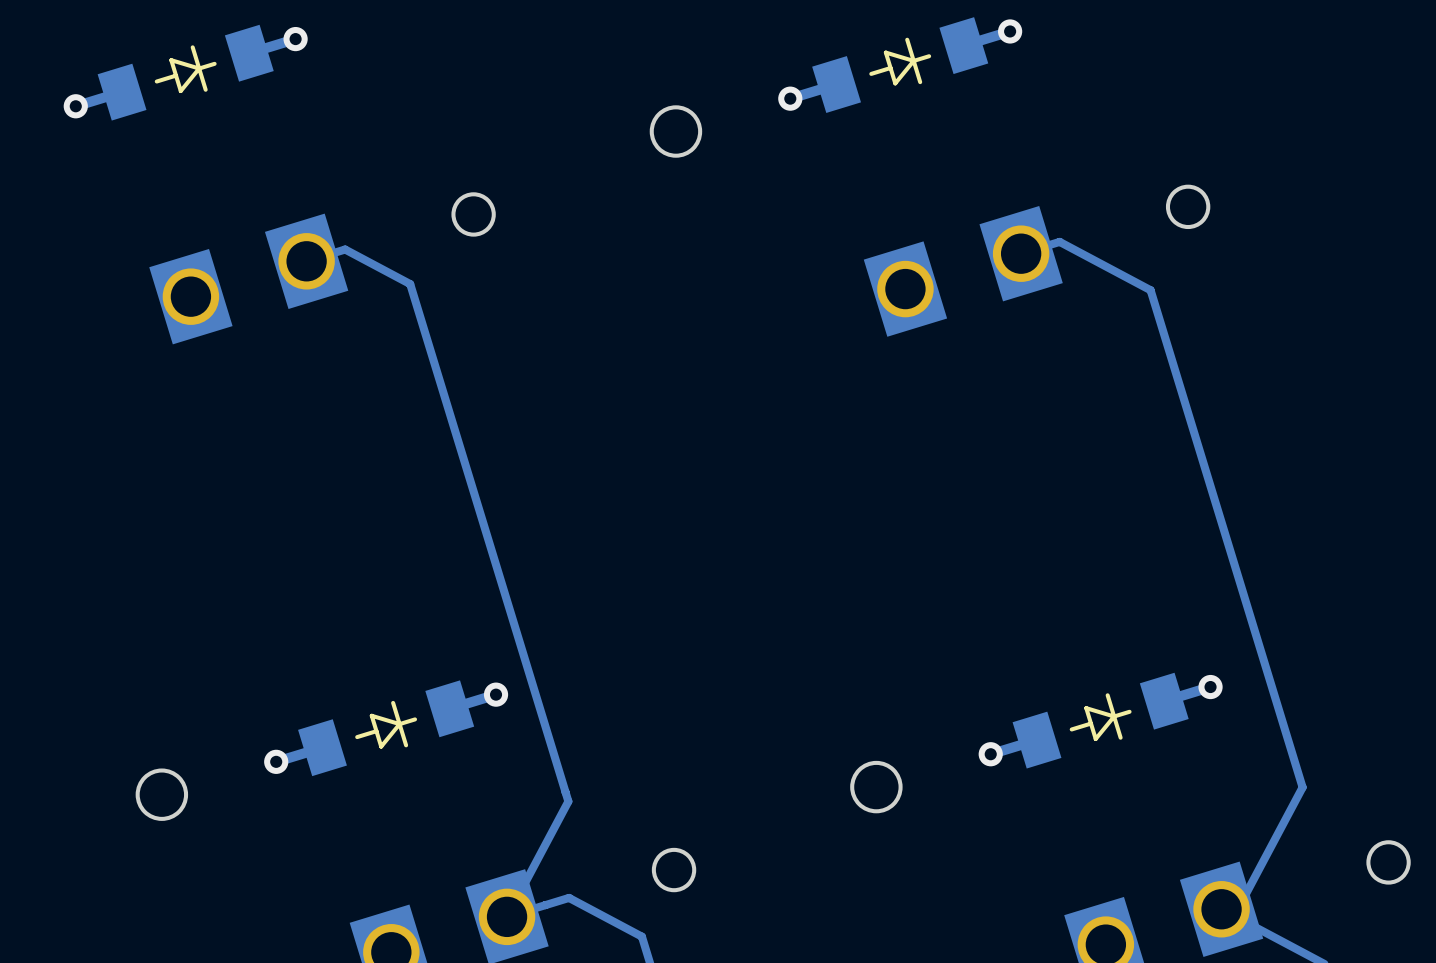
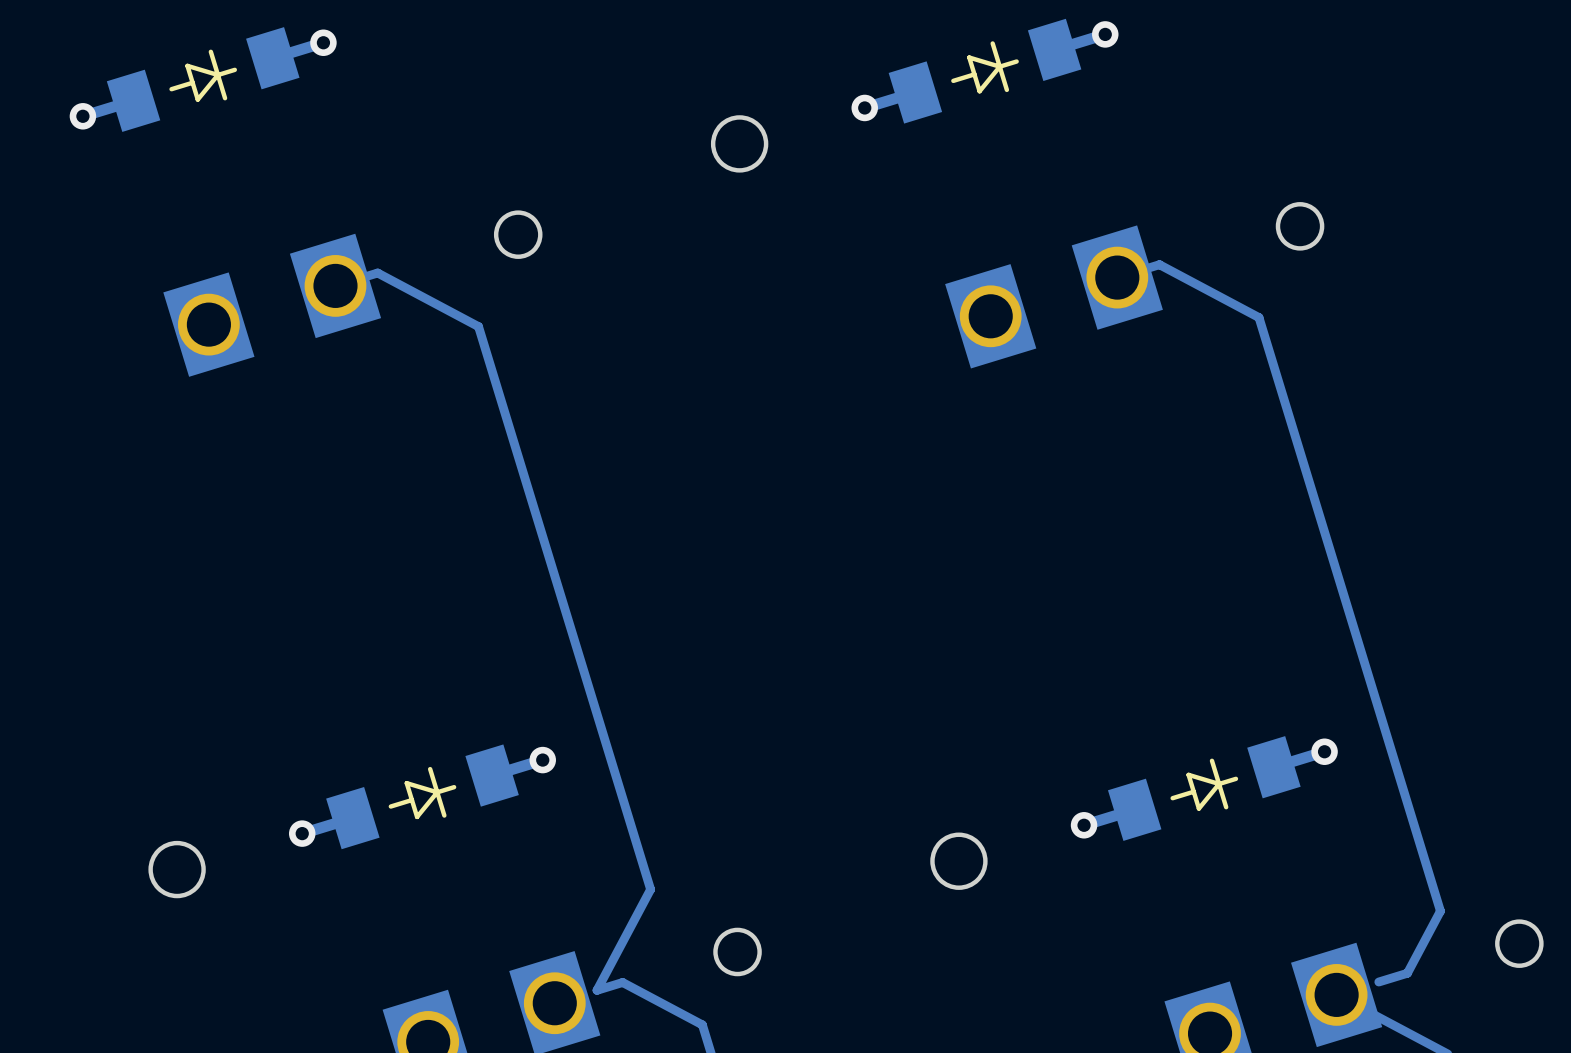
track: (410, 284) (568, 801) (507, 916) (545, 905) -> (448, 310) (478, 326) (650, 889) (596, 990)
track: (1302, 787) (1240, 903) -> (1425, 861) (1440, 911) (1407, 973) (1378, 982)

